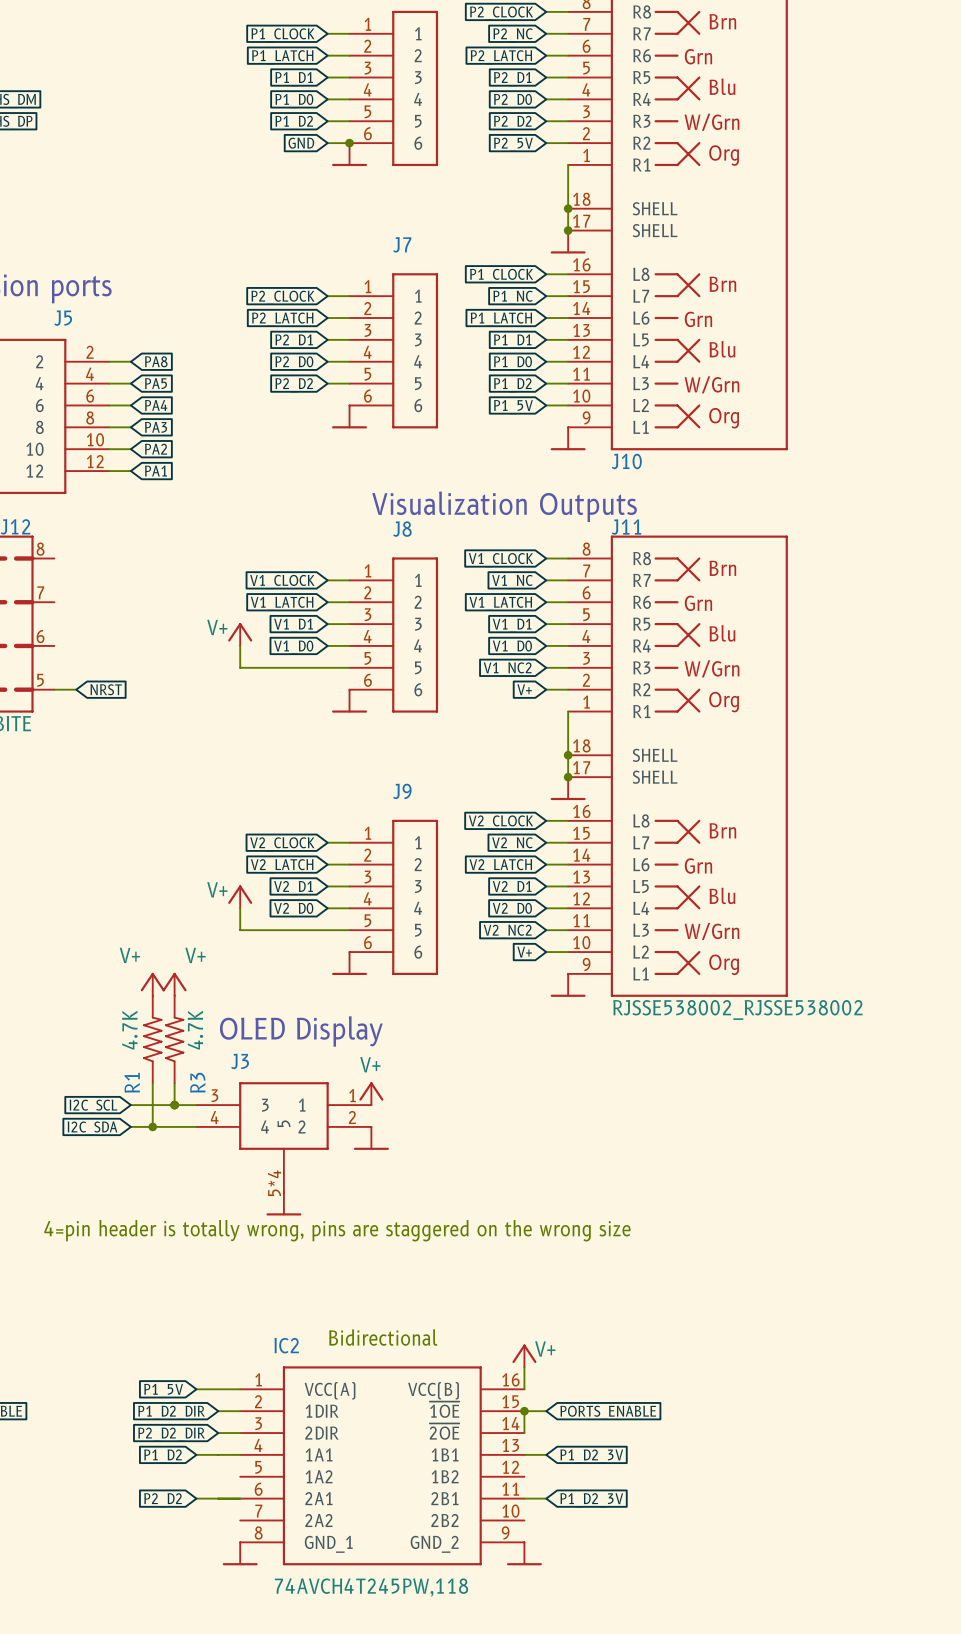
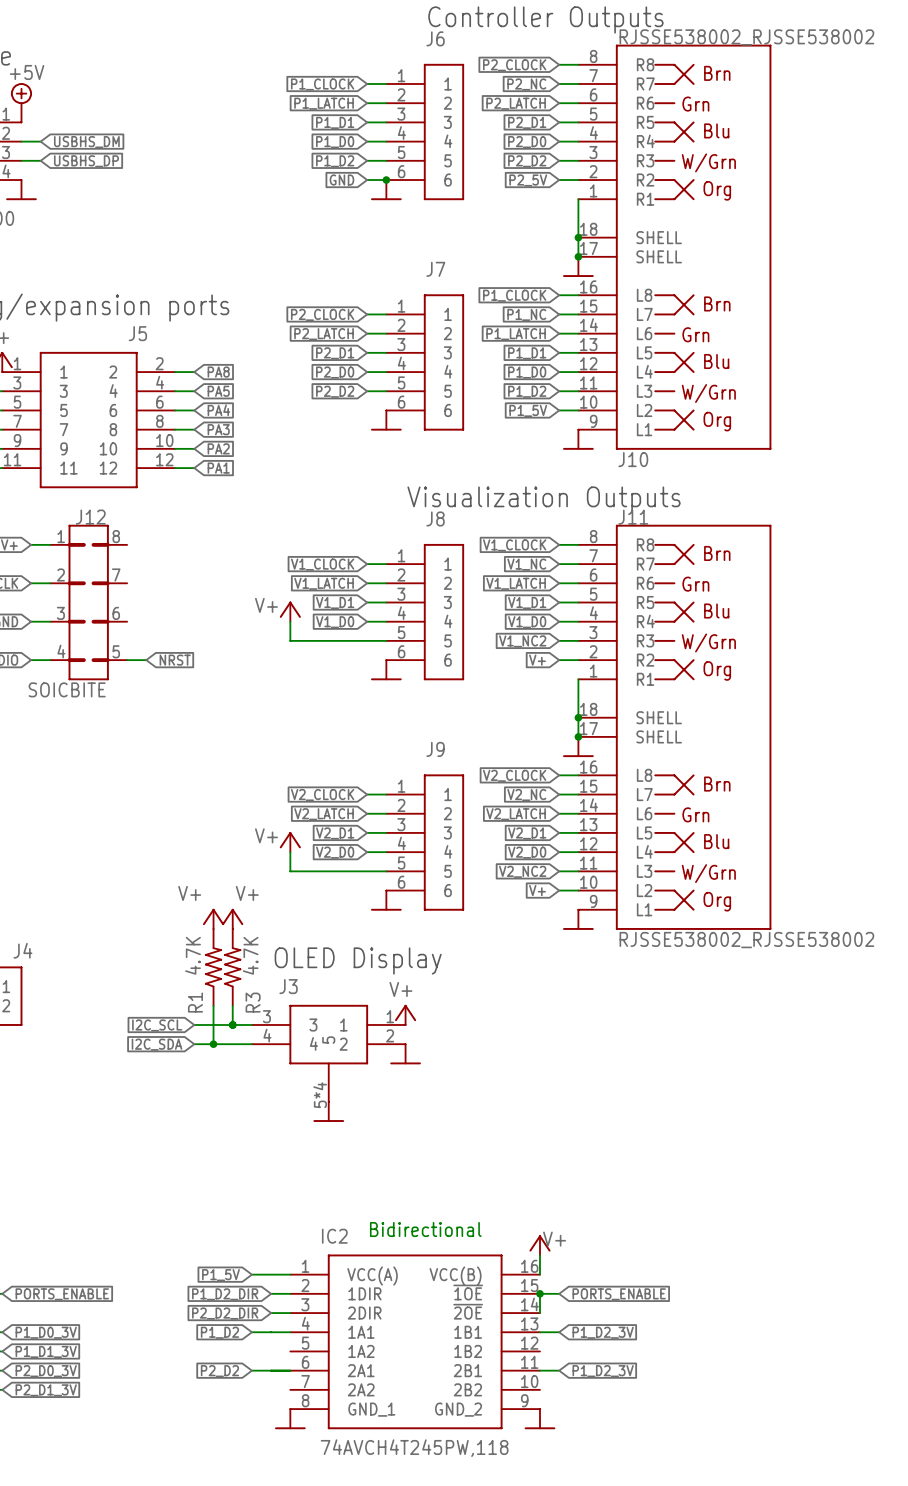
text: 4=pin header is totally wrong, pins are staggered on the wrong size (337, 1230) -> none

